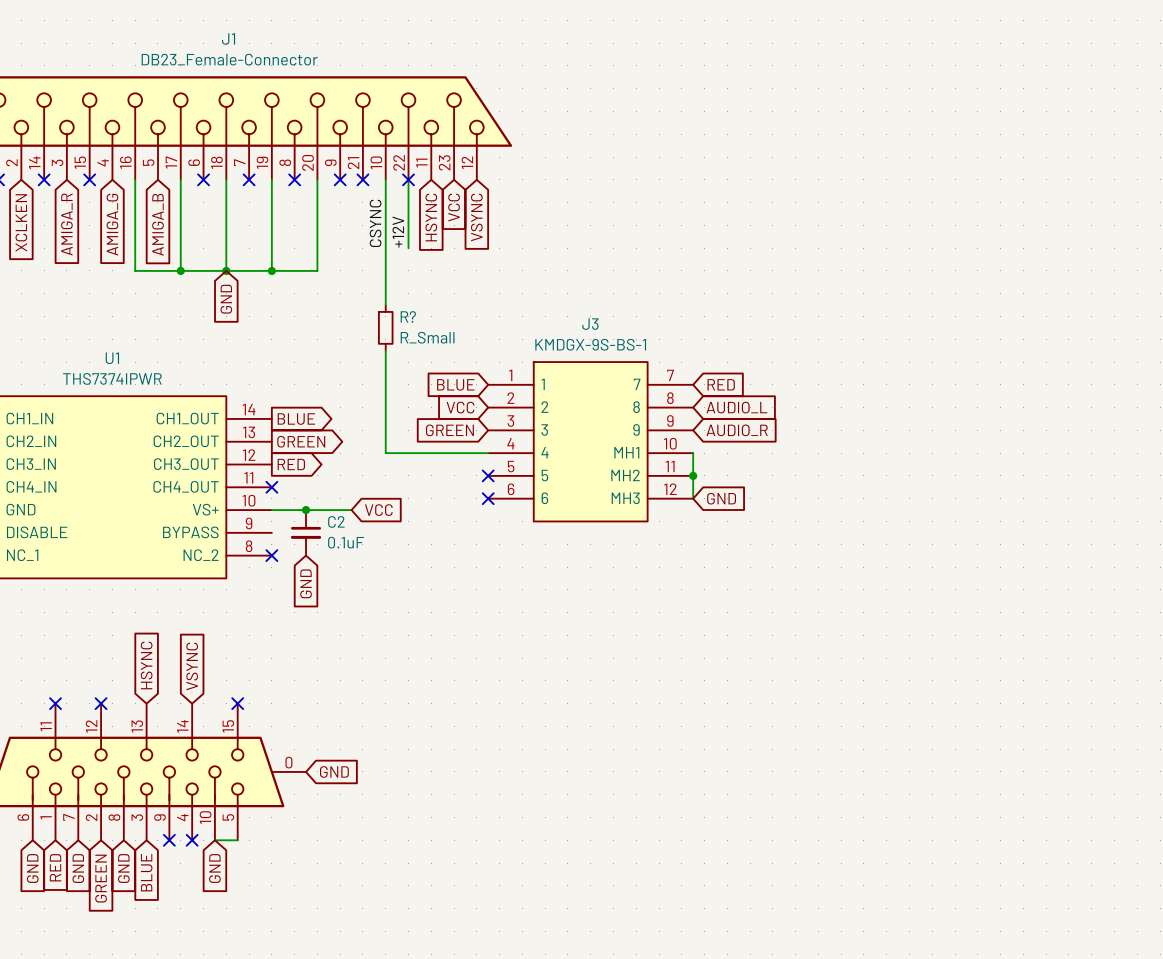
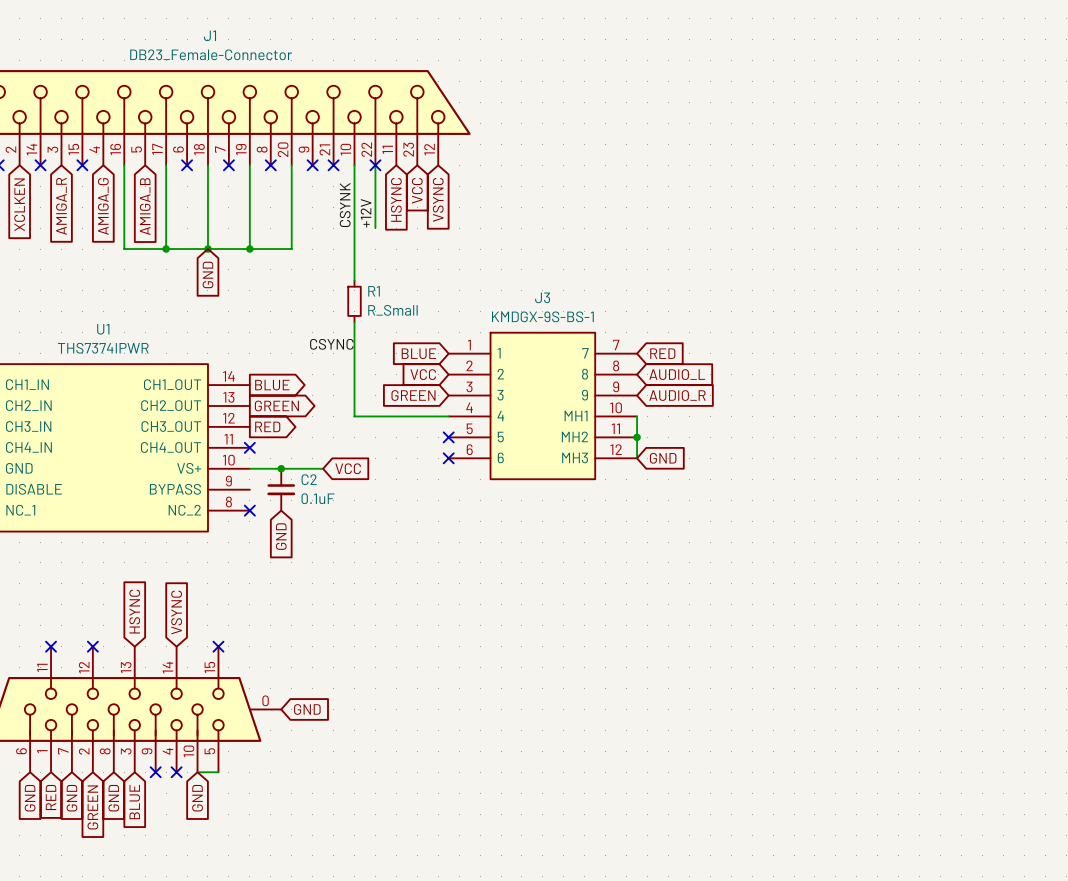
label: CSYNC (375, 223) -> CSYNK (345, 204)
R? name: R? (408, 316) -> R1 (374, 291)
label: none -> CSYNC (331, 344)

